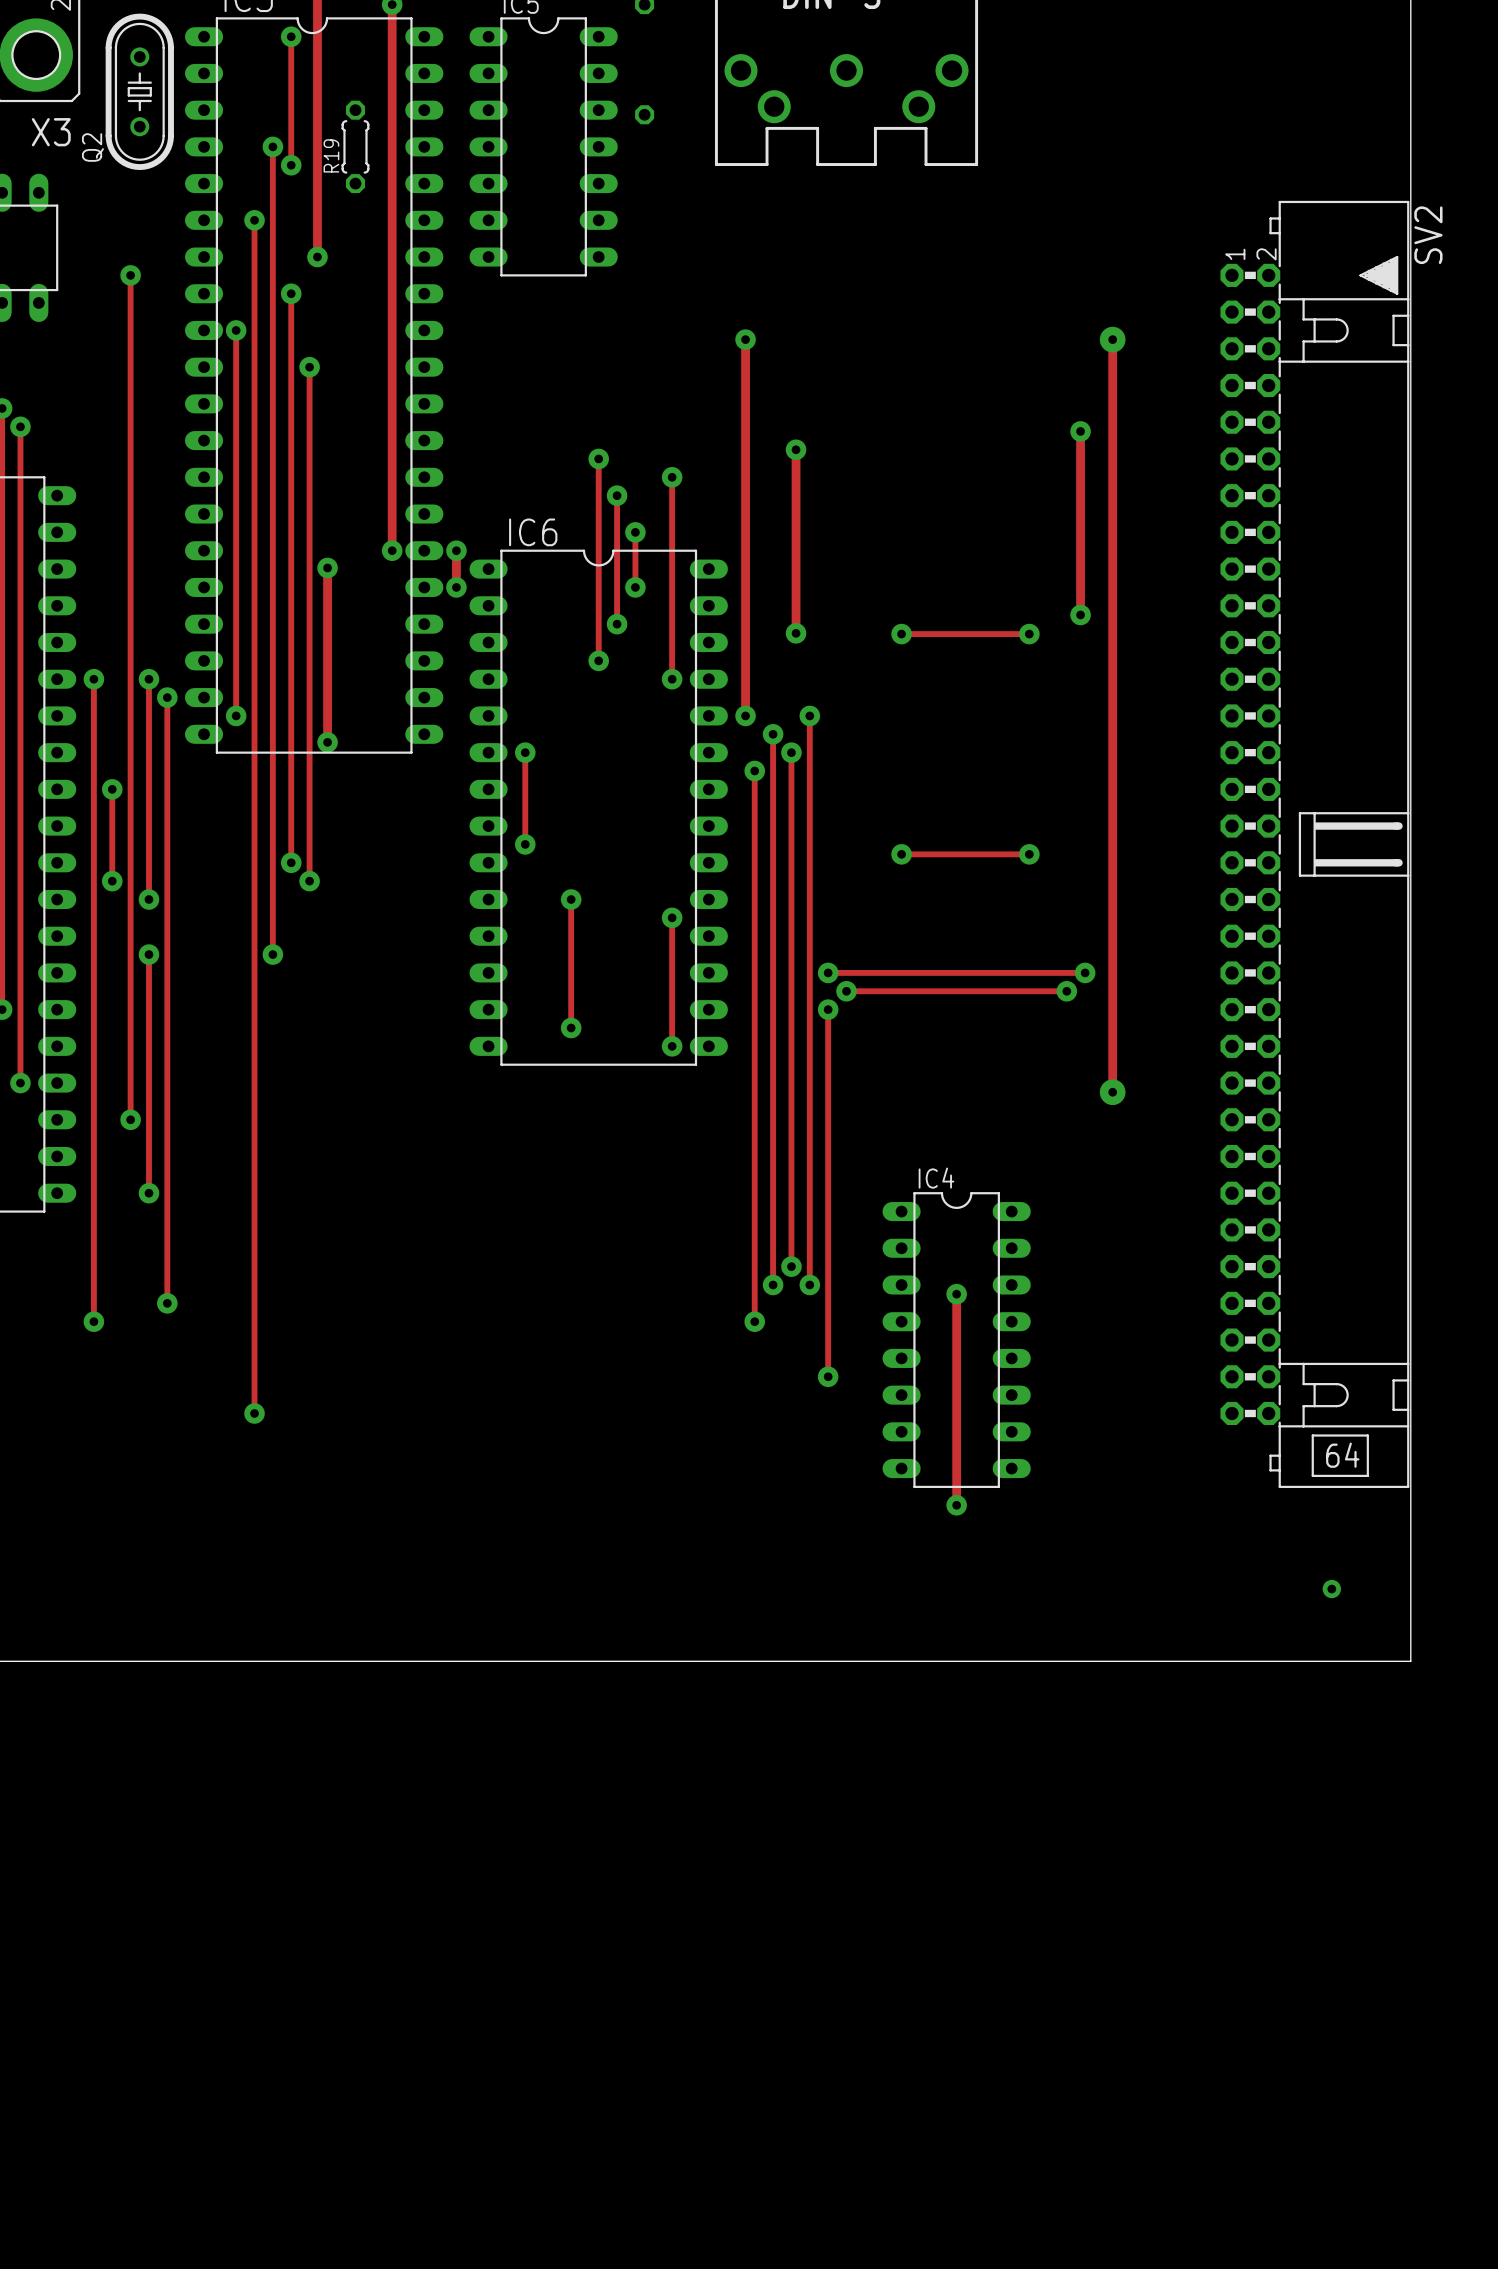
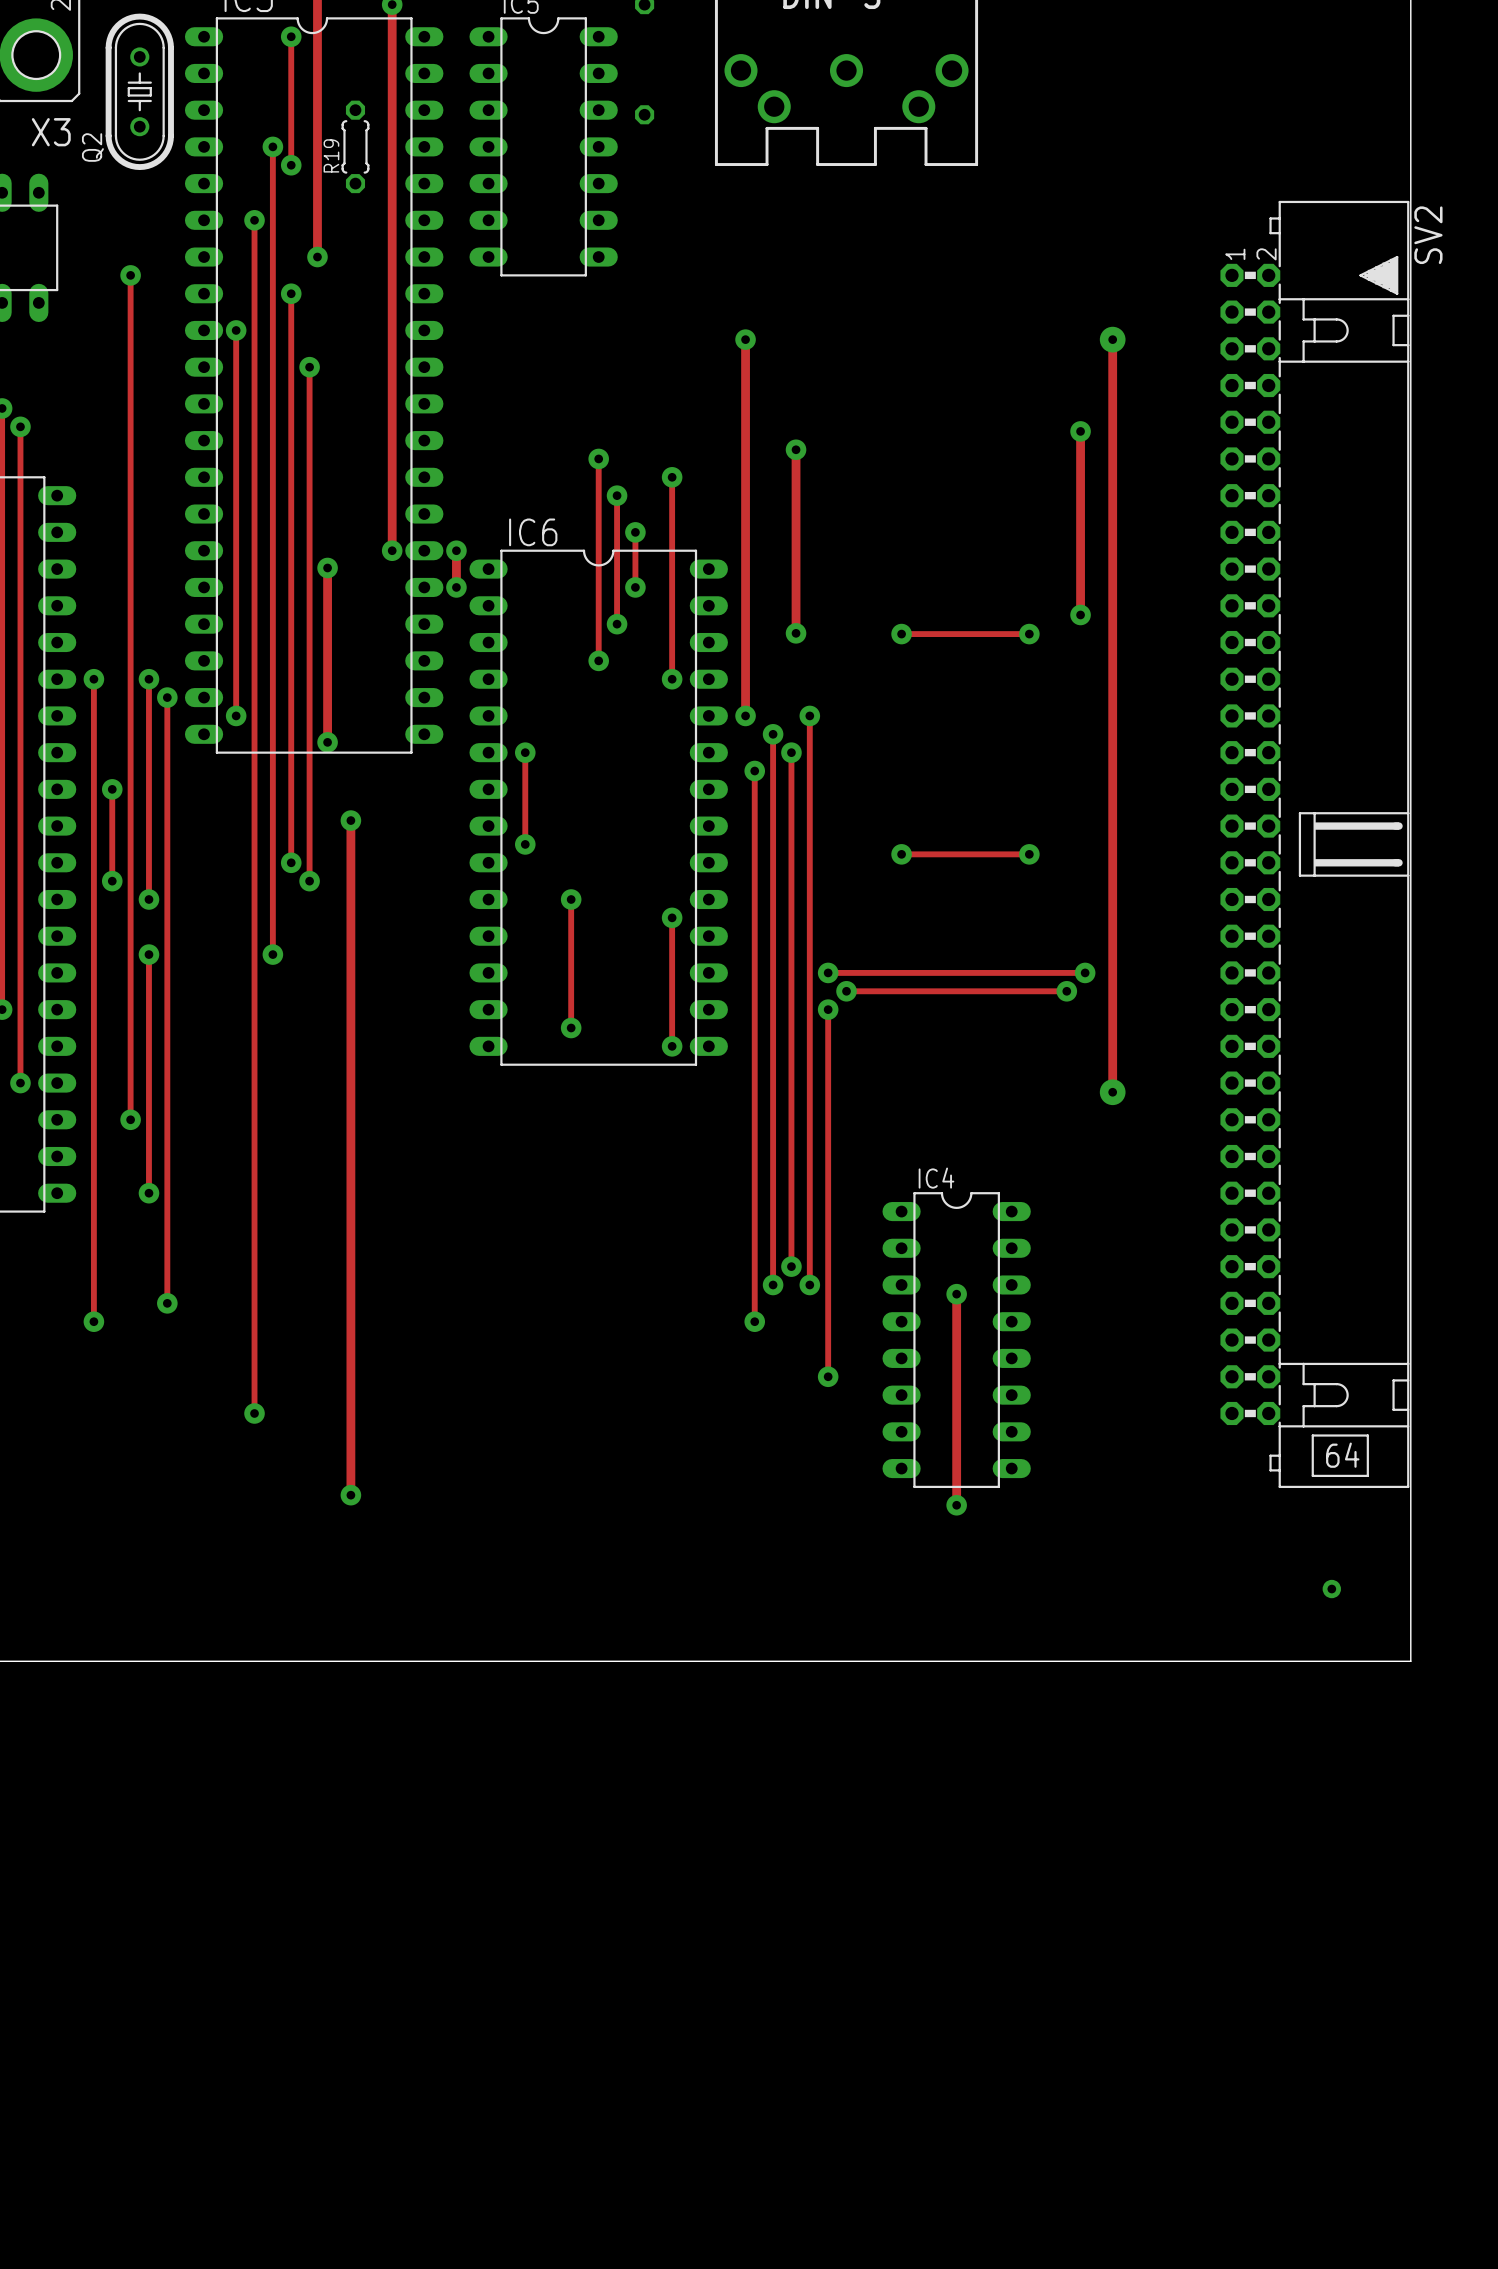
track: none -> (350, 820) (350, 1495)
via: none -> (350, 820)
via: none -> (350, 1495)

